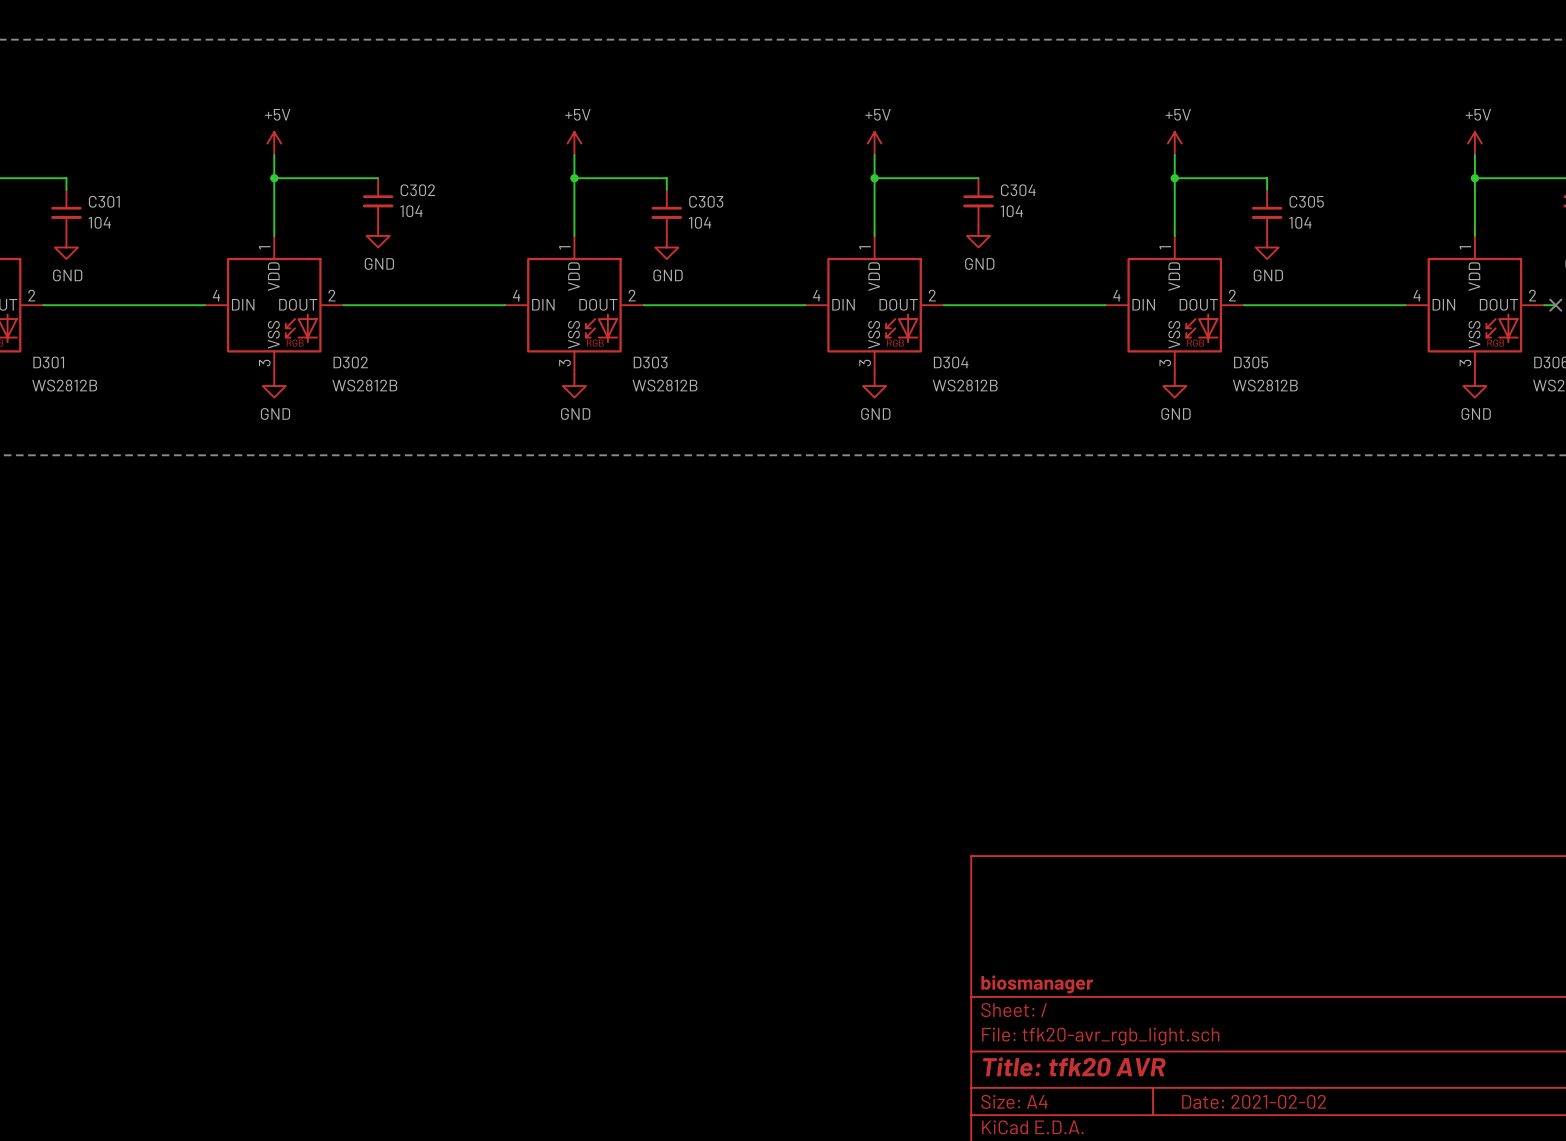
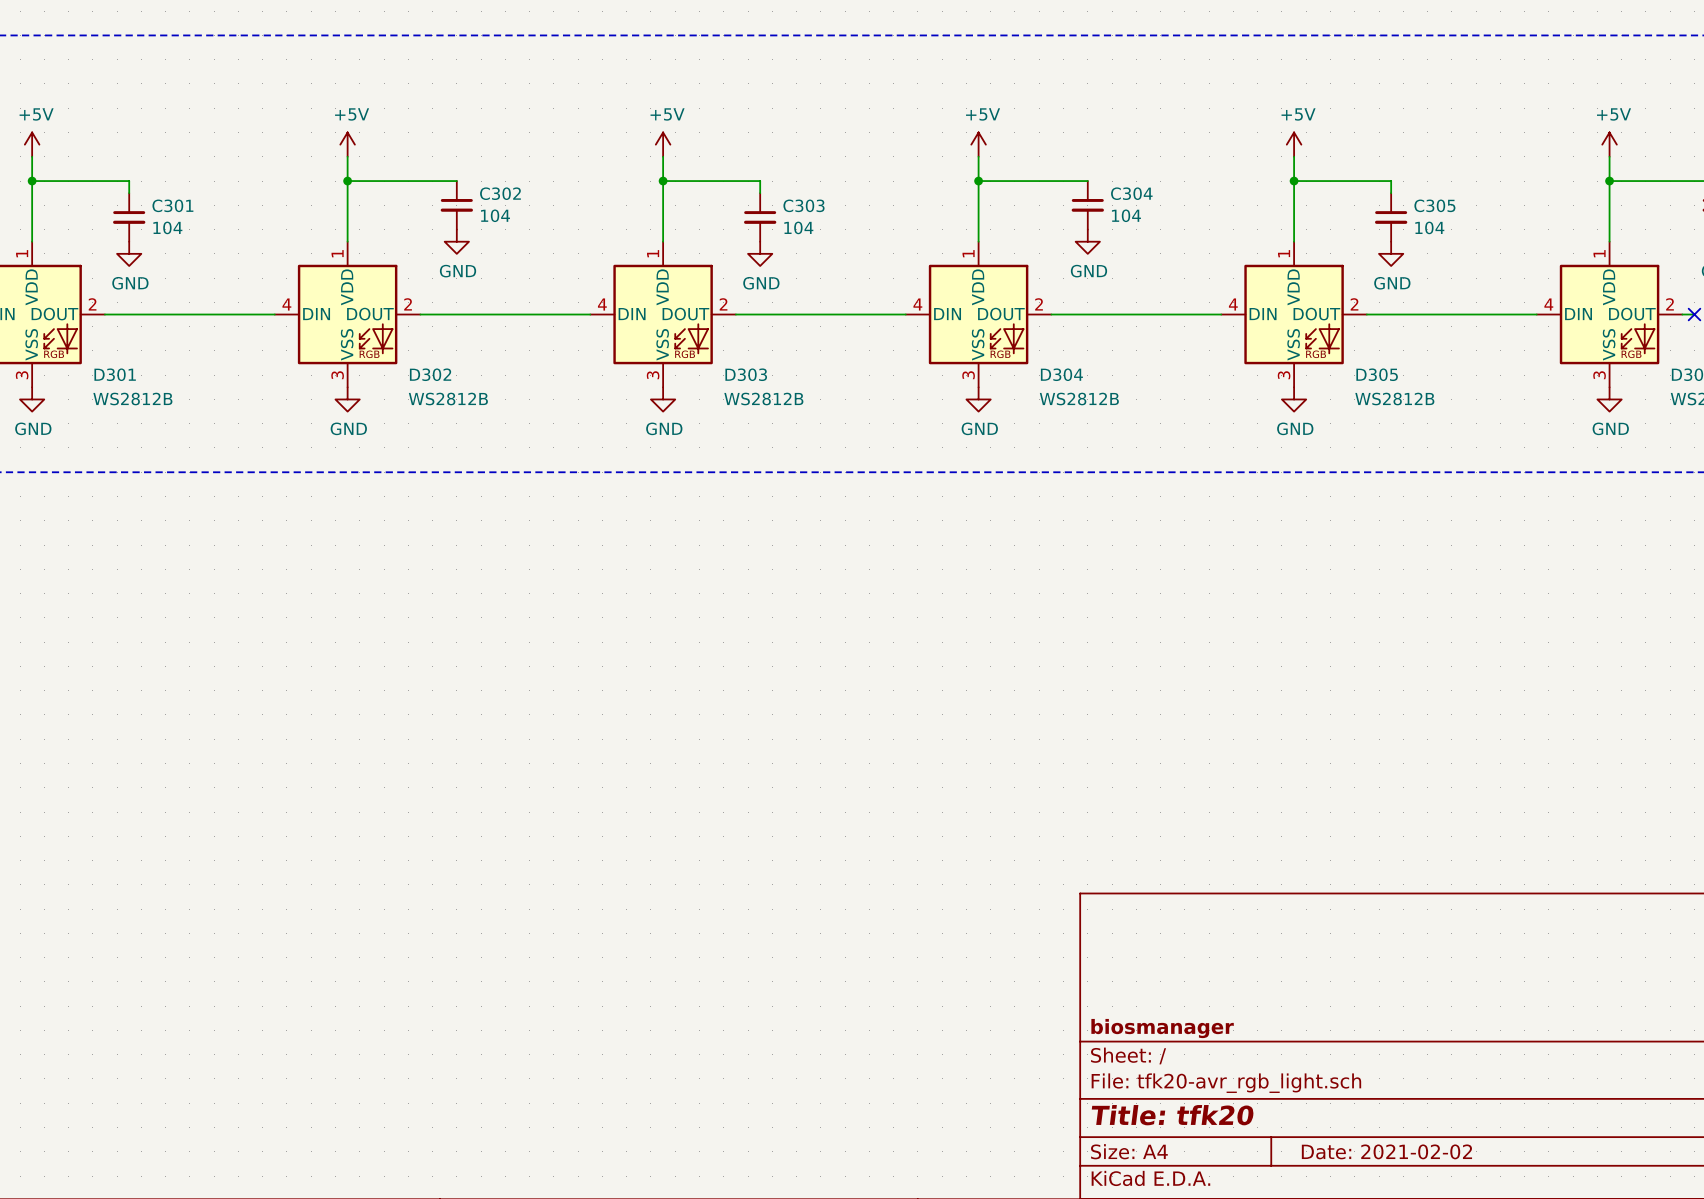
title block: Title: tfk20 AVR (1074, 1066) -> Title: tfk20 (1172, 1115)

